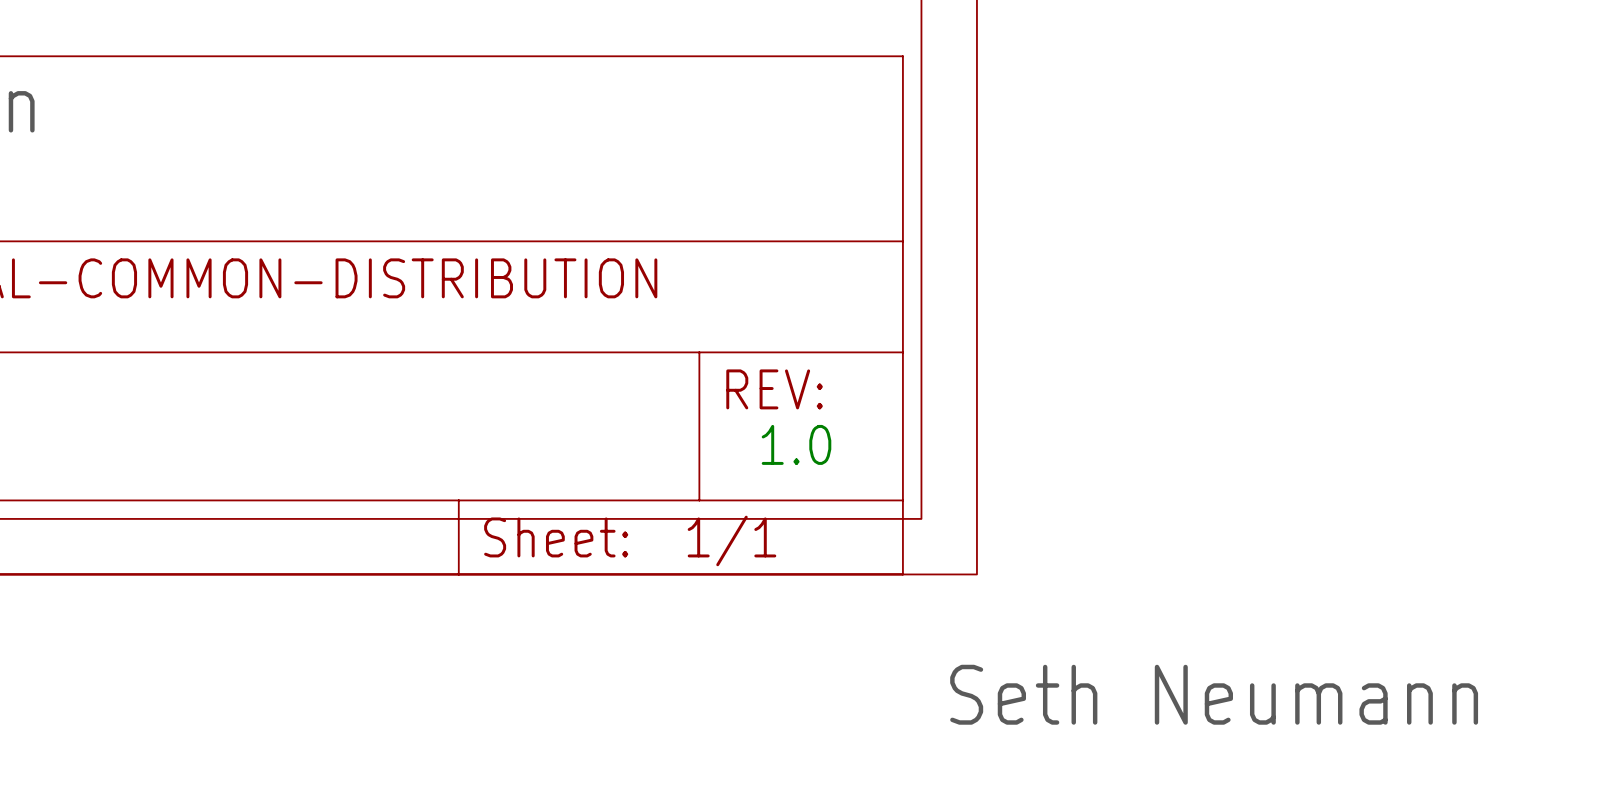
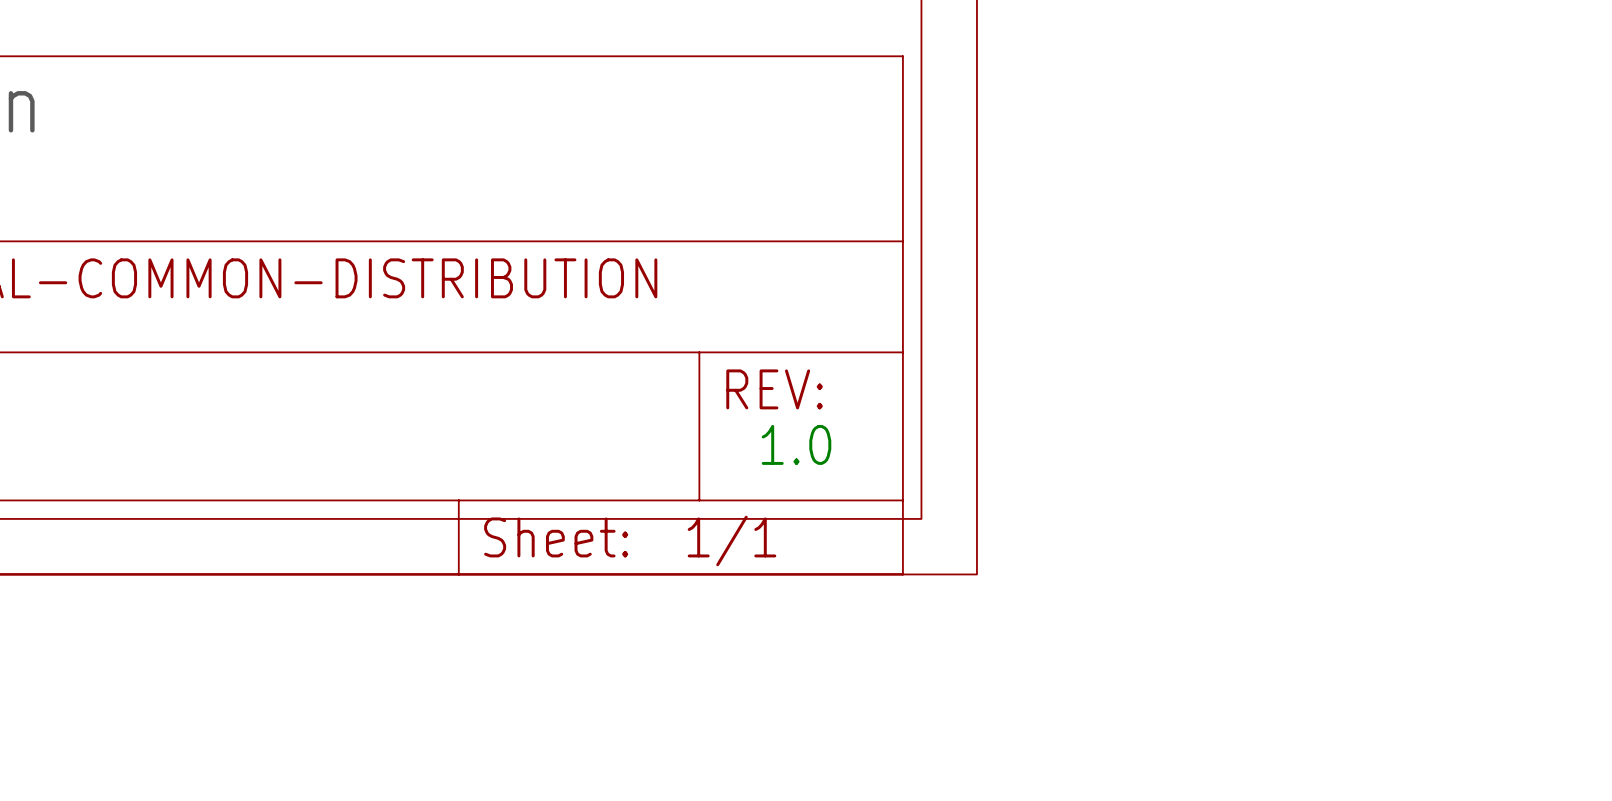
text: Seth Neumann (1214, 694) -> none

